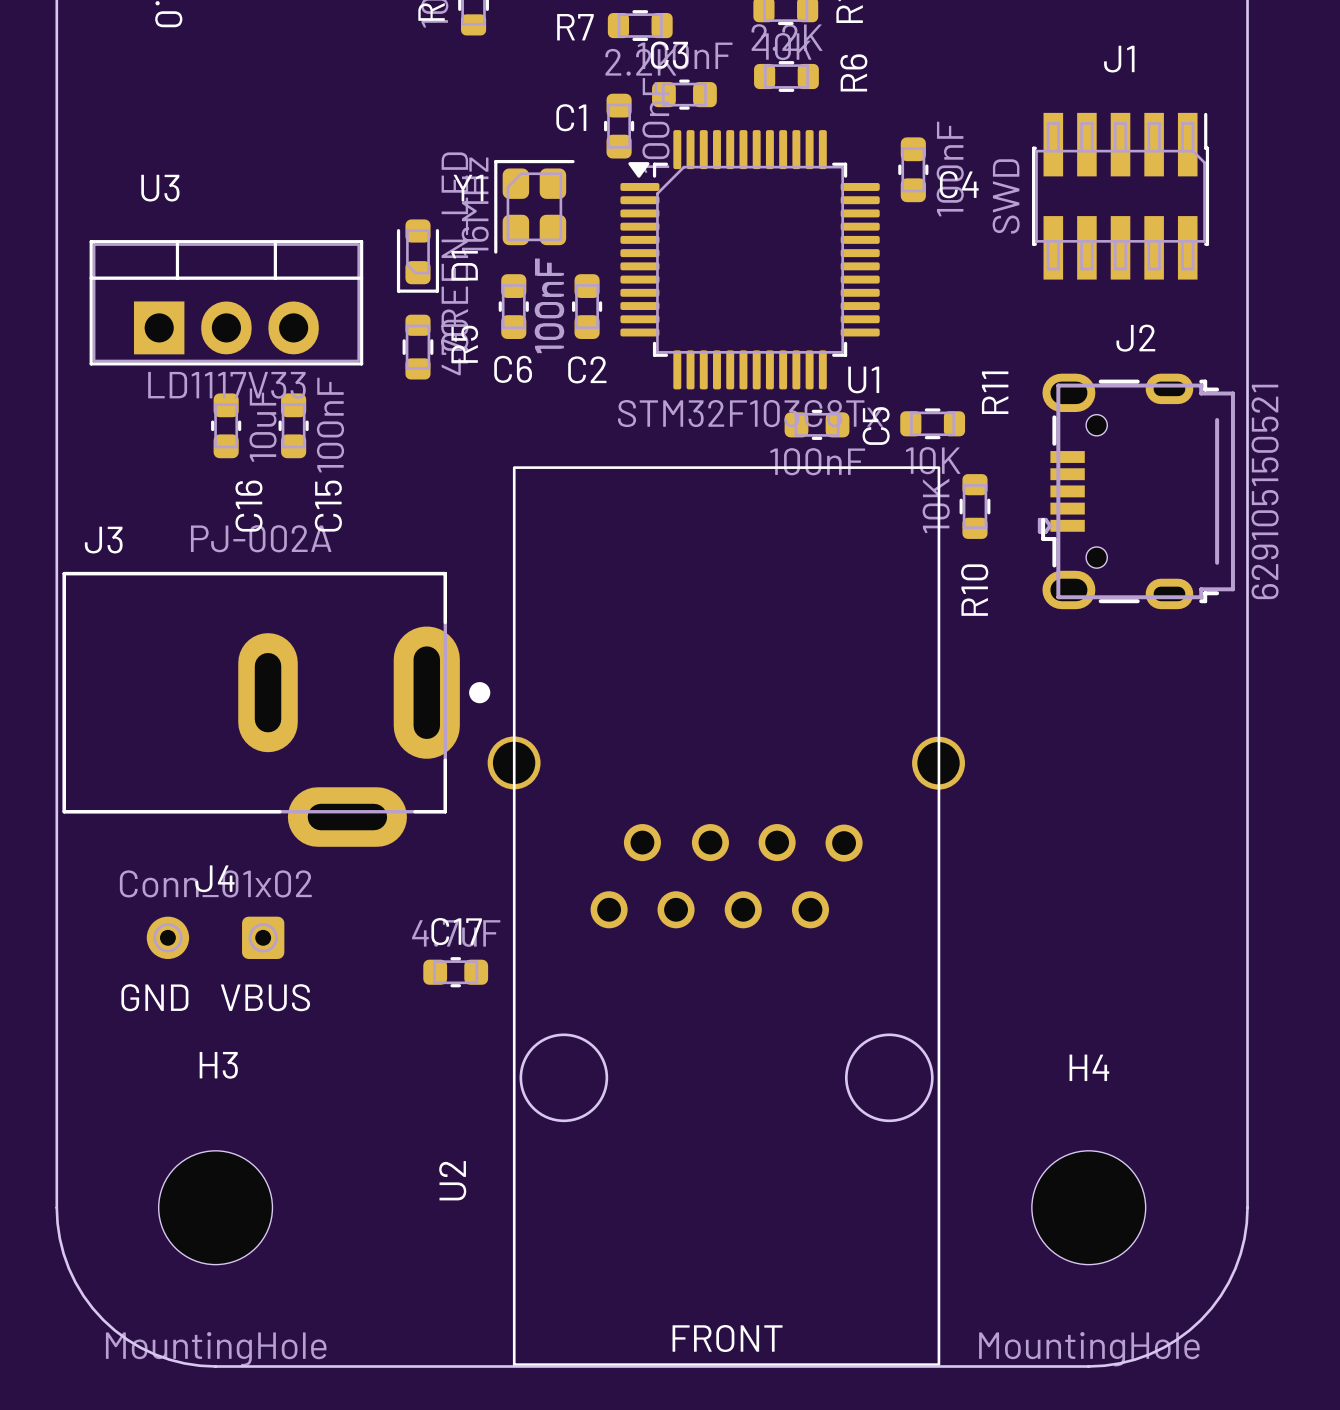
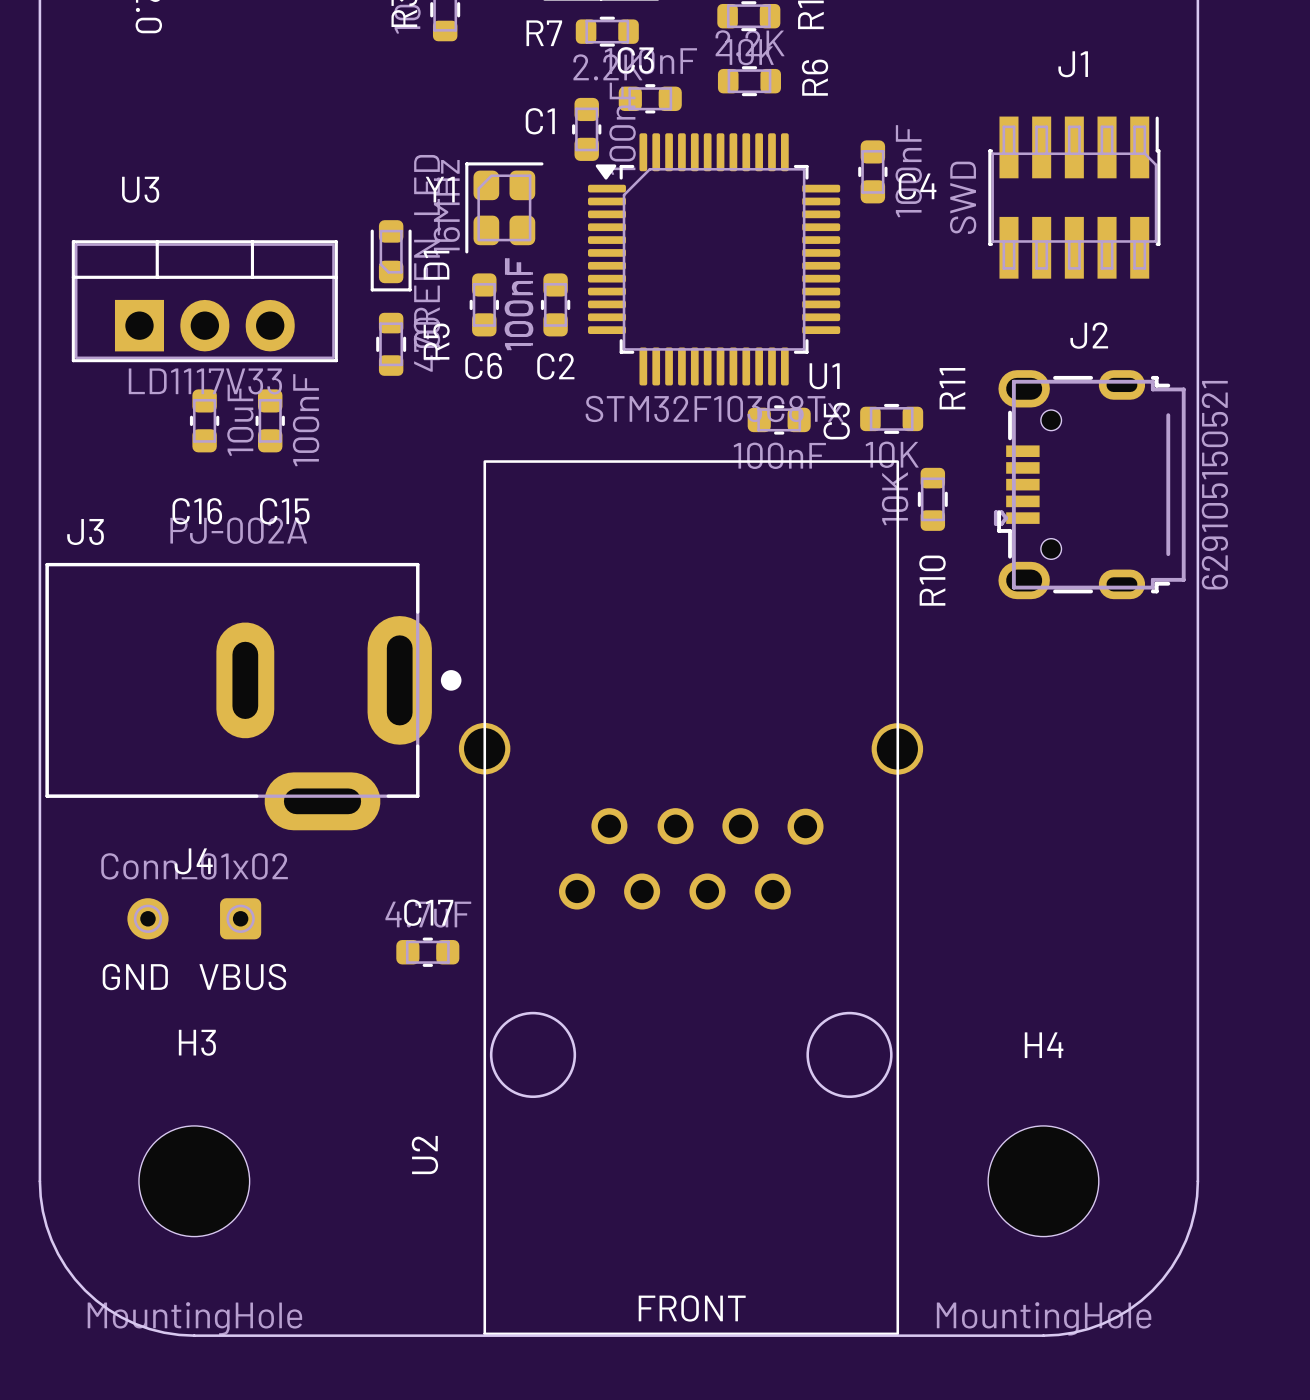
C16 name rotation: 0° (248, 506) -> 90° clockwise (197, 511)
C15 name rotation: 0° (328, 506) -> 90° clockwise (284, 511)

